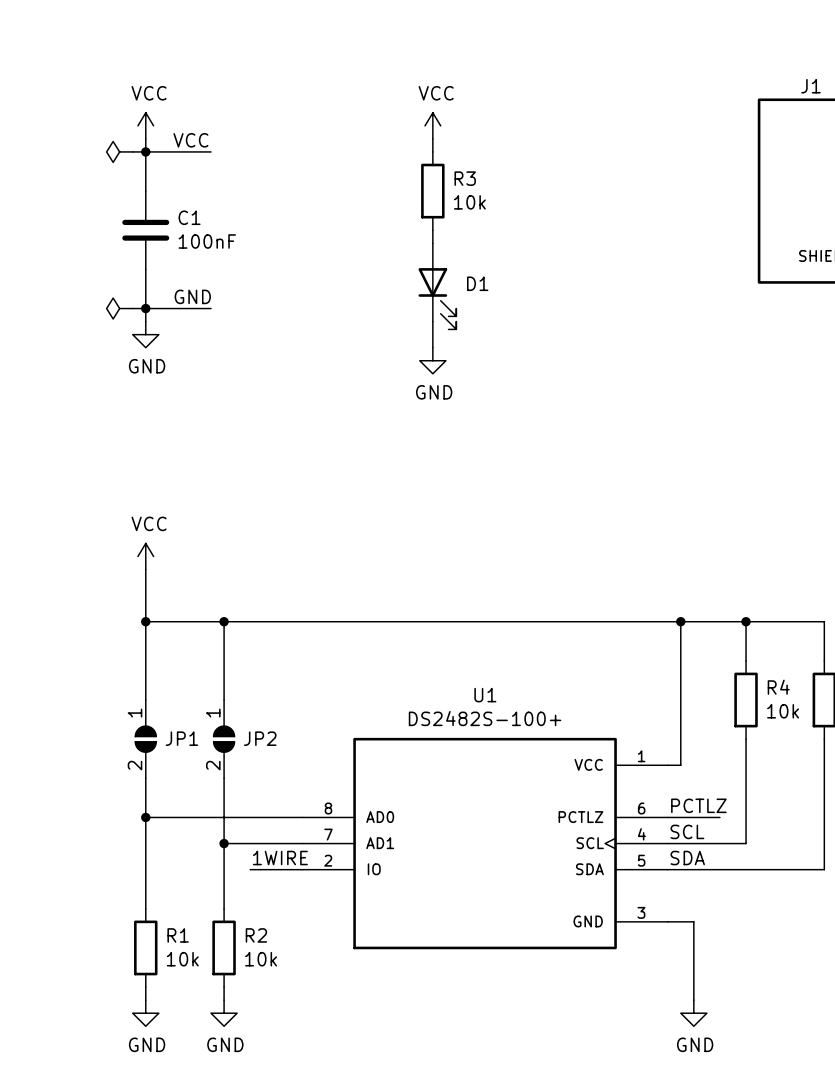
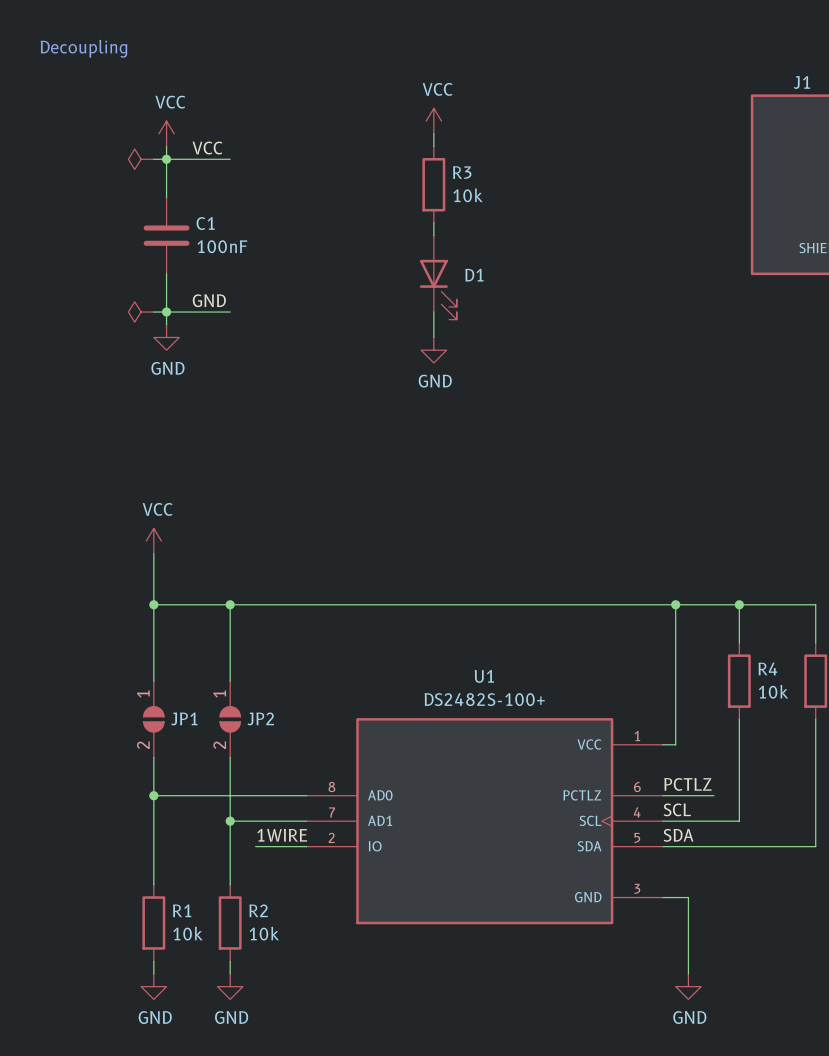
text: none -> Decoupling (83, 48)
power symbol position: VCC (145, 125) -> VCC (166, 133)
wire: (145, 138) (145, 191) -> (166, 146) (166, 197)
label position: VCC (190, 140) -> VCC (207, 148)
power symbol position: (119, 151) -> (141, 159)
wire: (132, 151) (211, 151) -> (153, 159) (230, 159)
junction position: (145, 151) -> (166, 159)
C1 position: (145, 230) -> (166, 235)
wire: (145, 269) (145, 321) -> (230, 312) (153, 312)
wire: none -> (166, 273) (166, 324)
label position: GND (192, 296) -> GND (209, 300)
power symbol position: (119, 308) -> (141, 312)
wire: (132, 308) (211, 308) -> none
junction position: (145, 308) -> (166, 312)
power symbol position: GND (145, 334) -> GND (166, 337)

